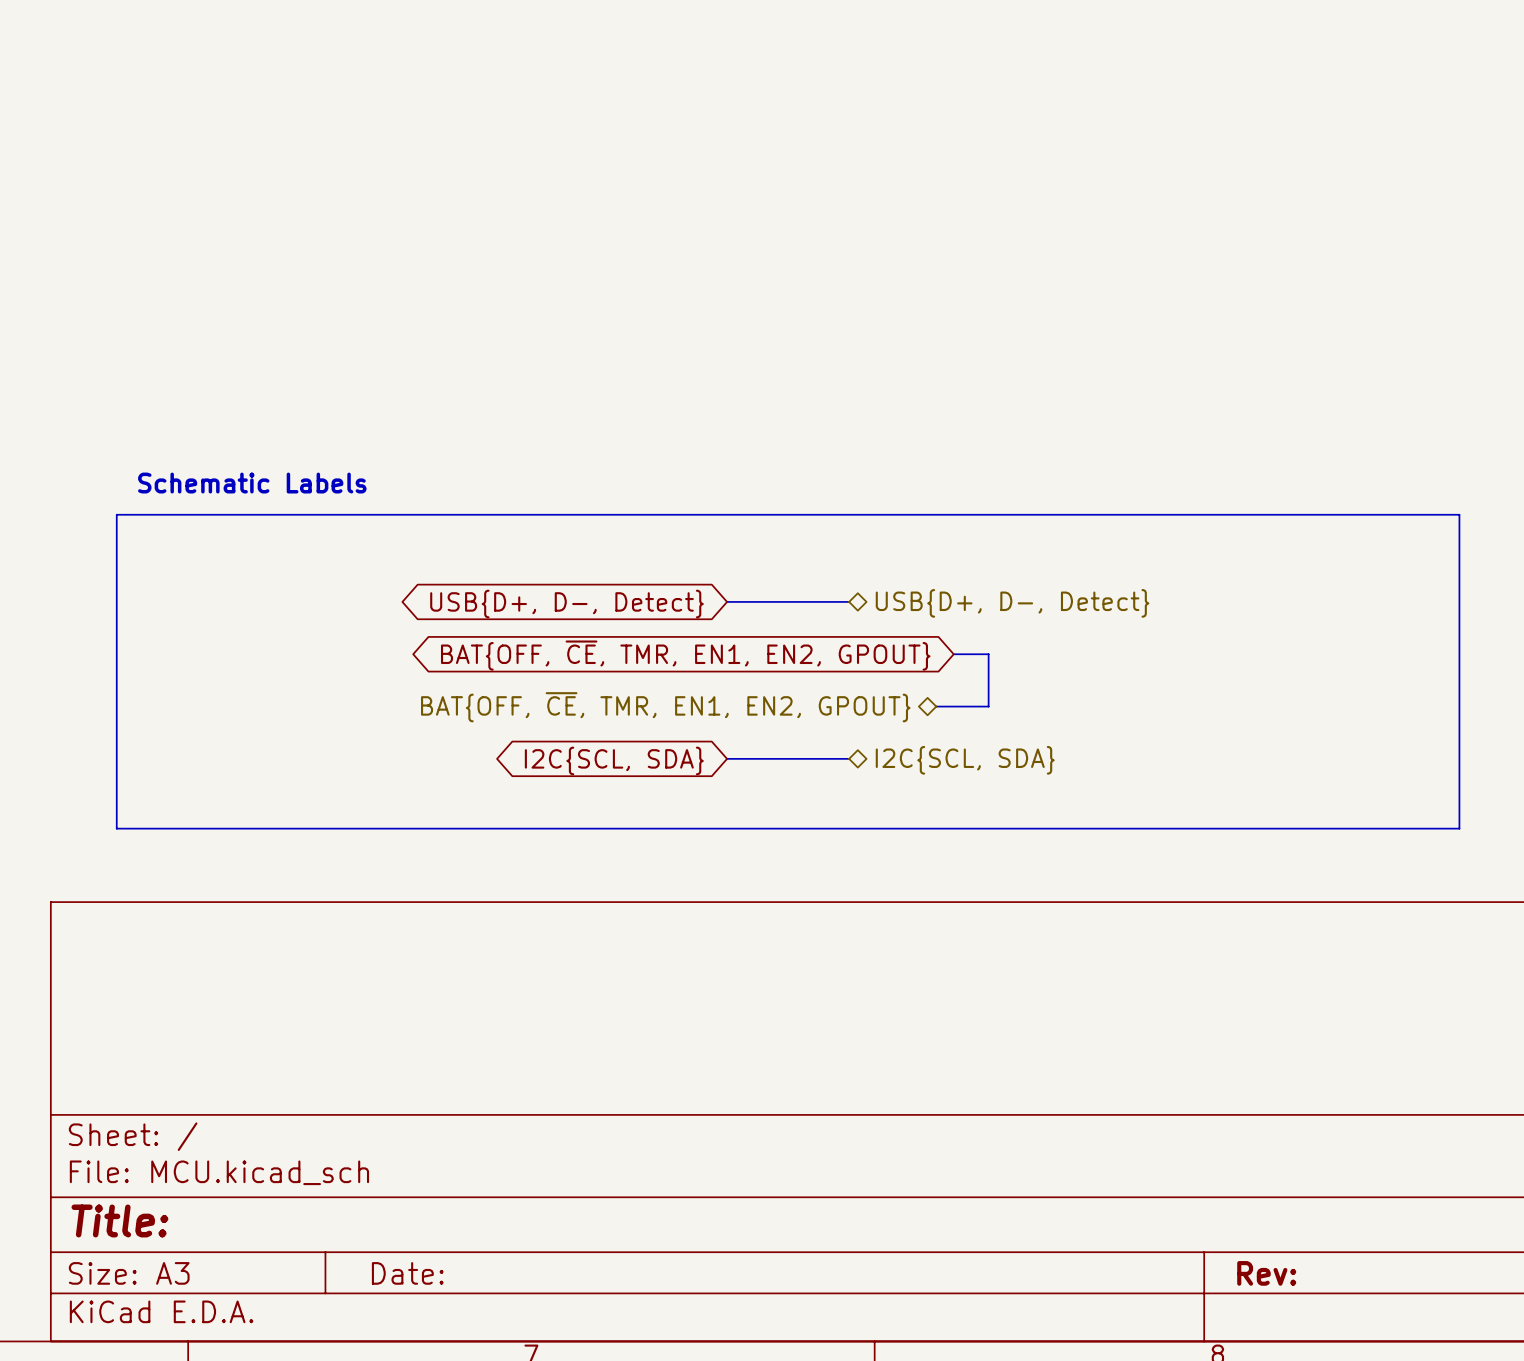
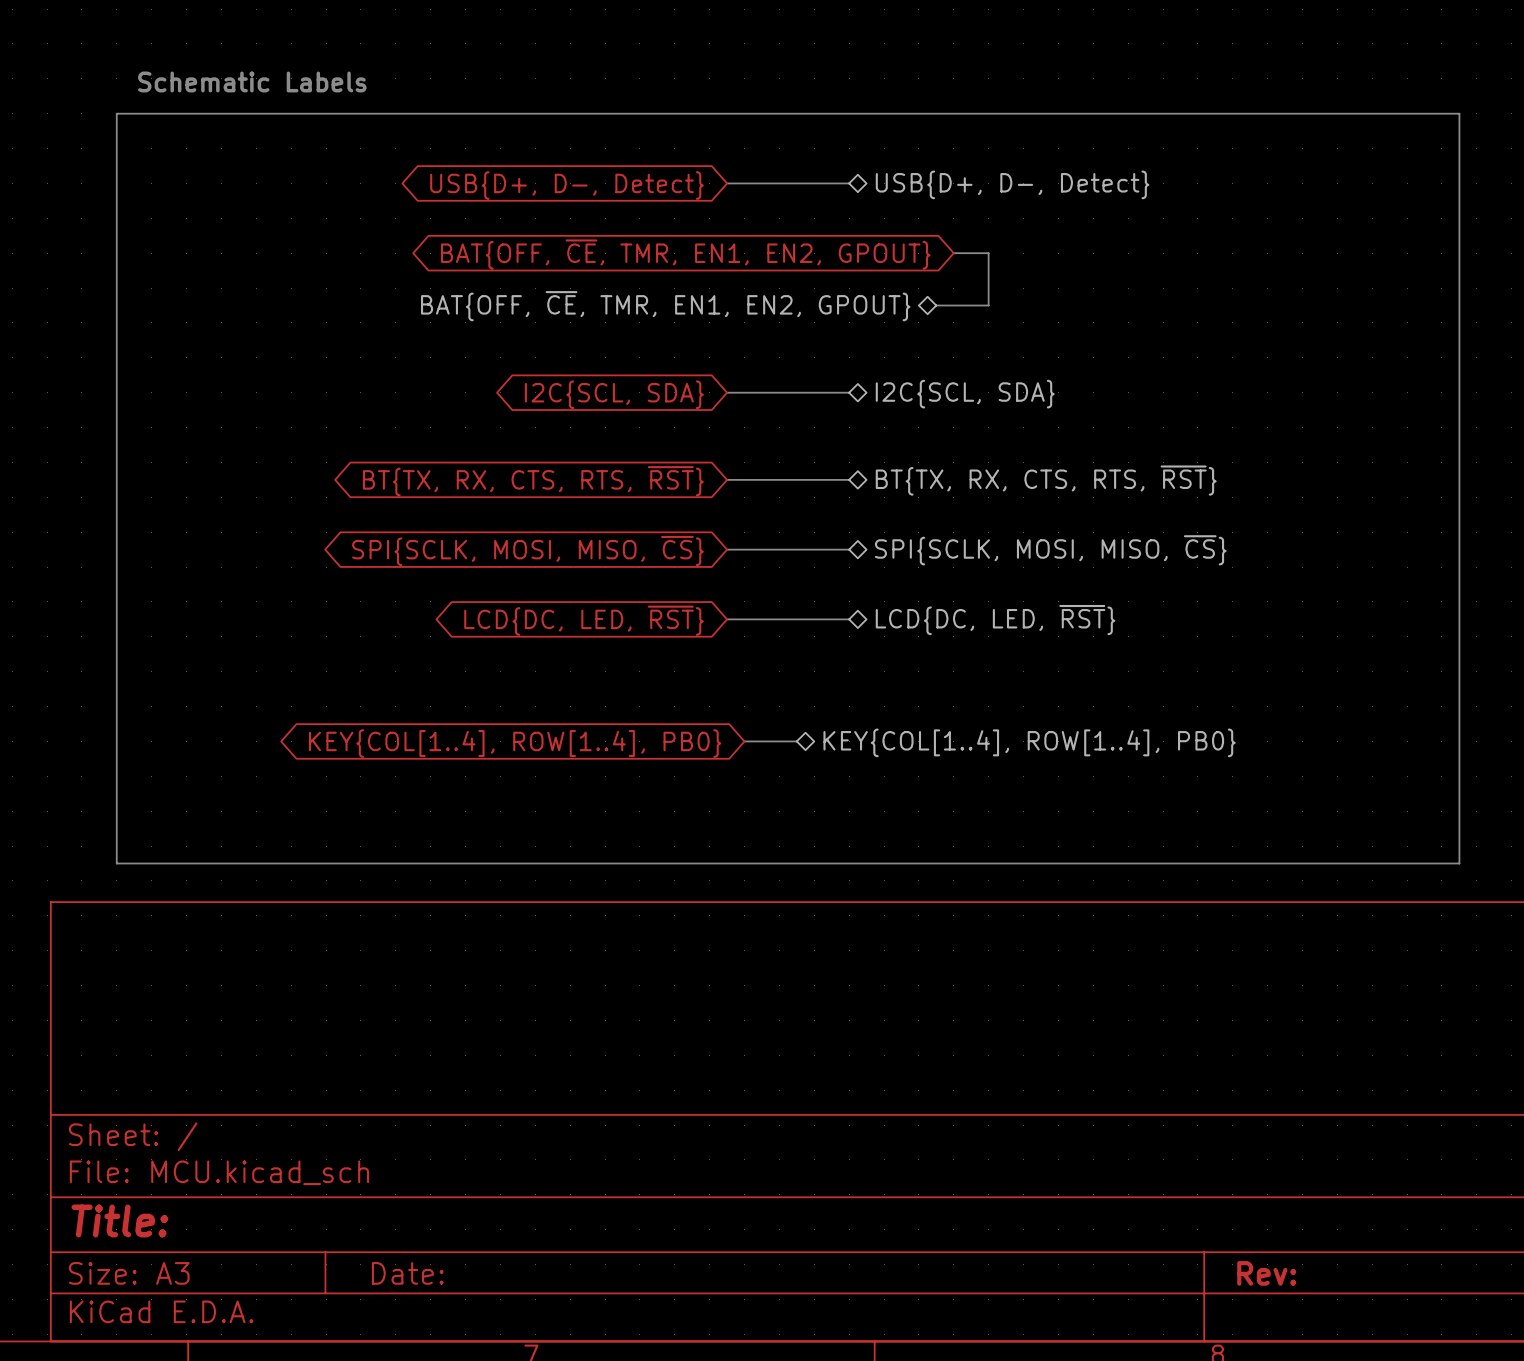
text: none -> Schematic Labels (252, 81)
bus: none -> (727, 183) (849, 183)
hierarchical label: none -> USB{D+, D-, Detect} (1012, 184)
global label: none -> USB{D+, D-, Detect} (566, 185)
bus: none -> (953, 253) (988, 253) (988, 305) (936, 305)
global label: none -> BAT{OFF, ~{CE}, TMR, EN1, EN2, GPOUT} (685, 254)
hierarchical label: none -> BAT{OFF, ~{CE}, TMR, EN1, EN2, GPOUT} (665, 306)
global label: none -> I2C{SCL, SDA} (614, 394)
hierarchical label: none -> I2C{SCL, SDA} (965, 394)
bus: none -> (727, 479) (849, 479)
hierarchical label: none -> BT{TX, RX, CTS, RTS, ~{RST}} (1046, 480)
global label: none -> BT{TX, RX, CTS, RTS, ~{RST}} (533, 481)
text: Schematic Labels (252, 483) -> none
line: (116, 514) (1459, 514) -> (116, 514) (116, 113) (1459, 113) (1459, 514)
global label: none -> SPI{SCLK, MOSI, MISO, ~{CS}} (527, 550)
hierarchical label: none -> SPI{SCLK, MOSI, MISO, ~{CS}} (1050, 550)
bus: (727, 601) (849, 601) -> (727, 392) (849, 392)
hierarchical label: USB{D+, D-, Detect} (1012, 603) -> none
global label: USB{D+, D-, Detect} (566, 604) -> none
bus: none -> (727, 619) (849, 619)
global label: none -> LCD{DC, LED, ~{RST}} (584, 620)
hierarchical label: none -> LCD{DC, LED, ~{RST}} (995, 620)
bus: (953, 654) (988, 654) (988, 706) (936, 706) -> none
global label: BAT{OFF, ~{CE}, TMR, EN1, EN2, GPOUT} (685, 655) -> none
hierarchical label: BAT{OFF, ~{CE}, TMR, EN1, EN2, GPOUT} (665, 707) -> none
bus: none -> (744, 741) (796, 741)
hierarchical label: none -> KEY{COL[1..4], ROW[1..4], PB0} (1029, 742)
global label: none -> KEY{COL[1..4], ROW[1..4], PB0} (515, 743)
bus: (727, 758) (849, 758) -> (727, 549) (849, 549)
global label: I2C{SCL, SDA} (614, 760) -> none
hierarchical label: I2C{SCL, SDA} (965, 760) -> none
line: (116, 828) (1459, 828) -> (116, 828) (116, 863) (1459, 863) (1459, 828)

